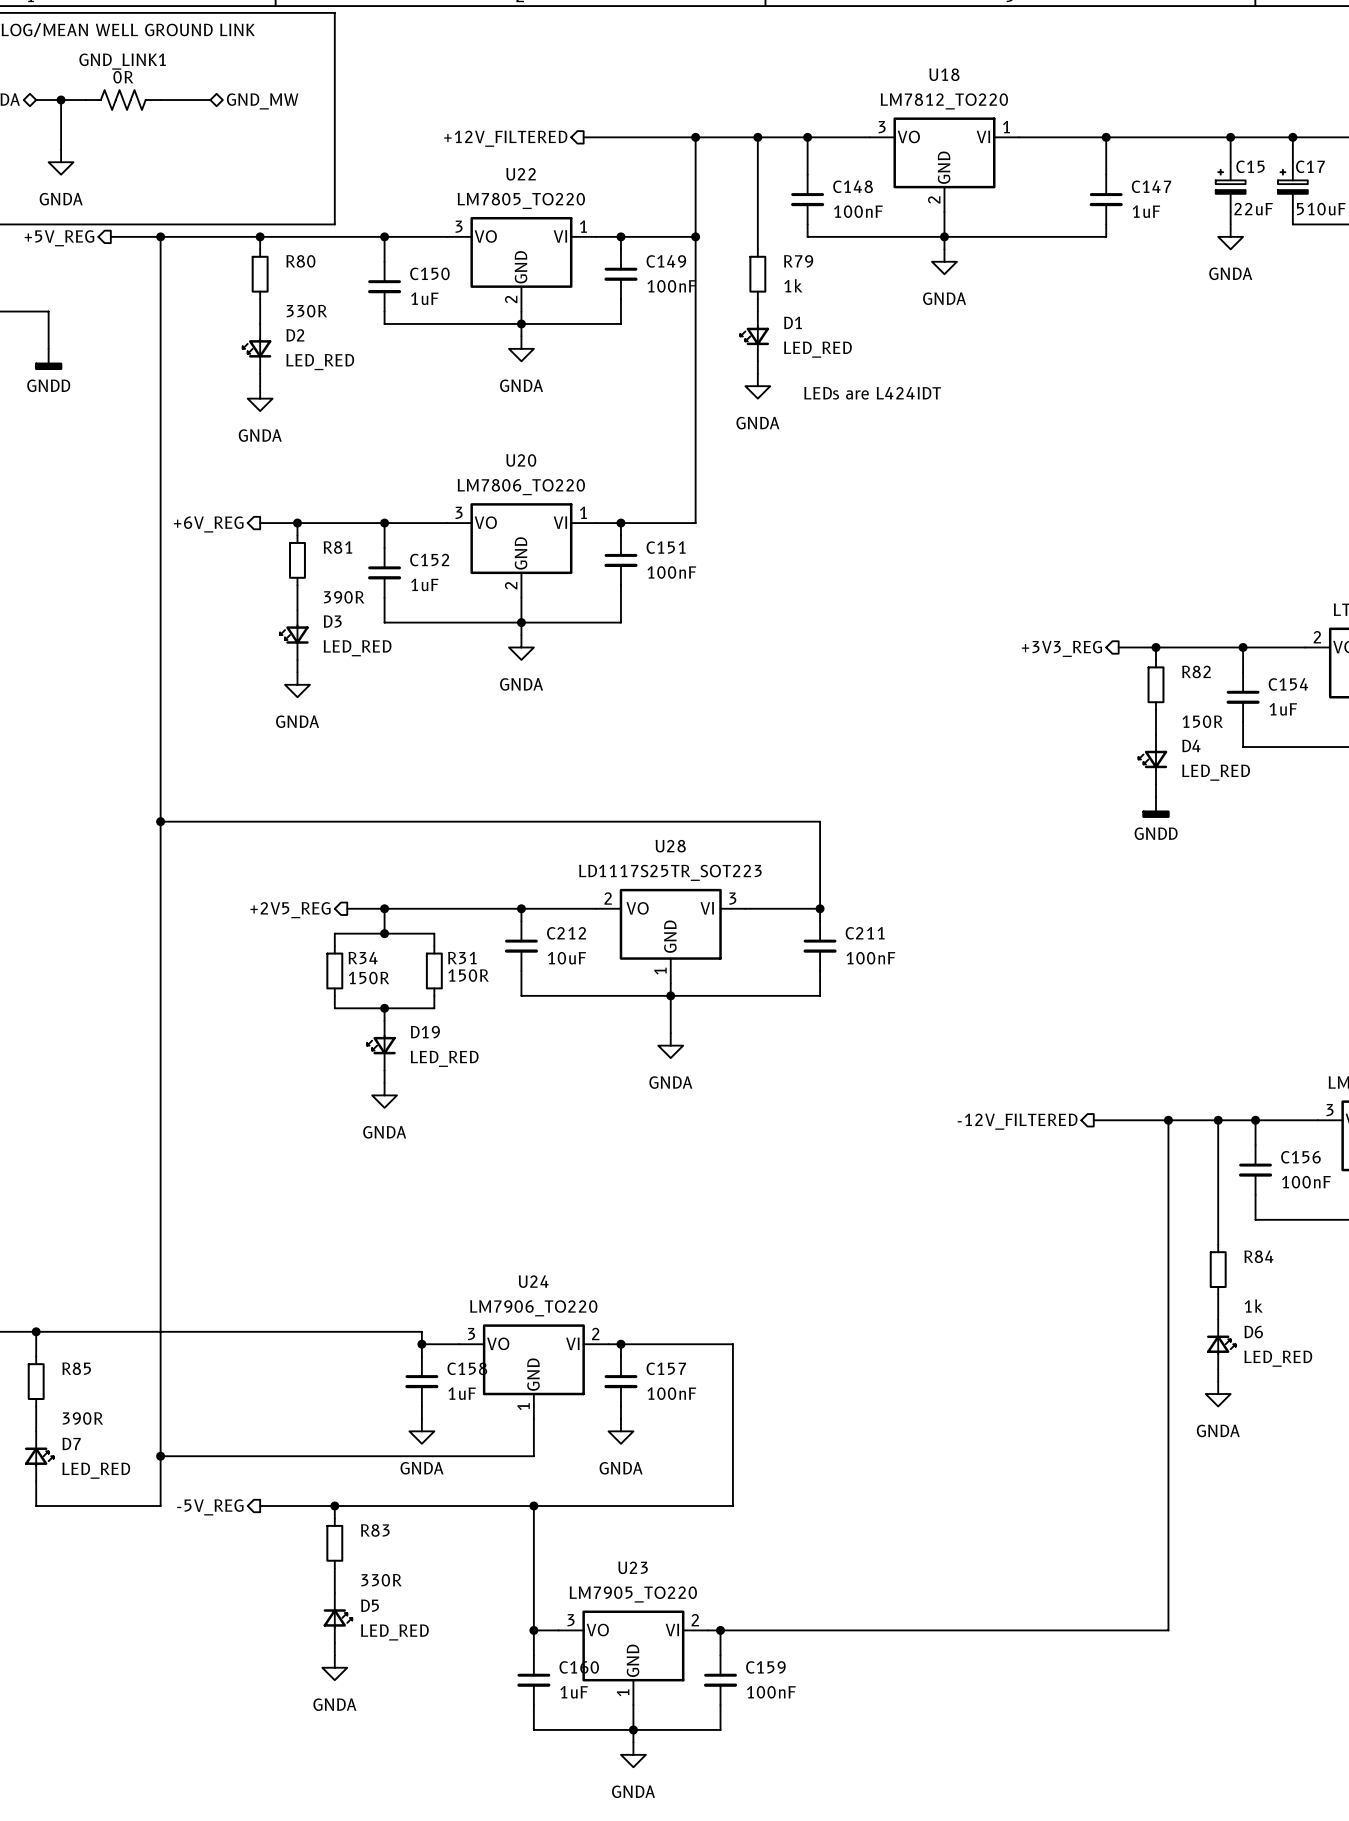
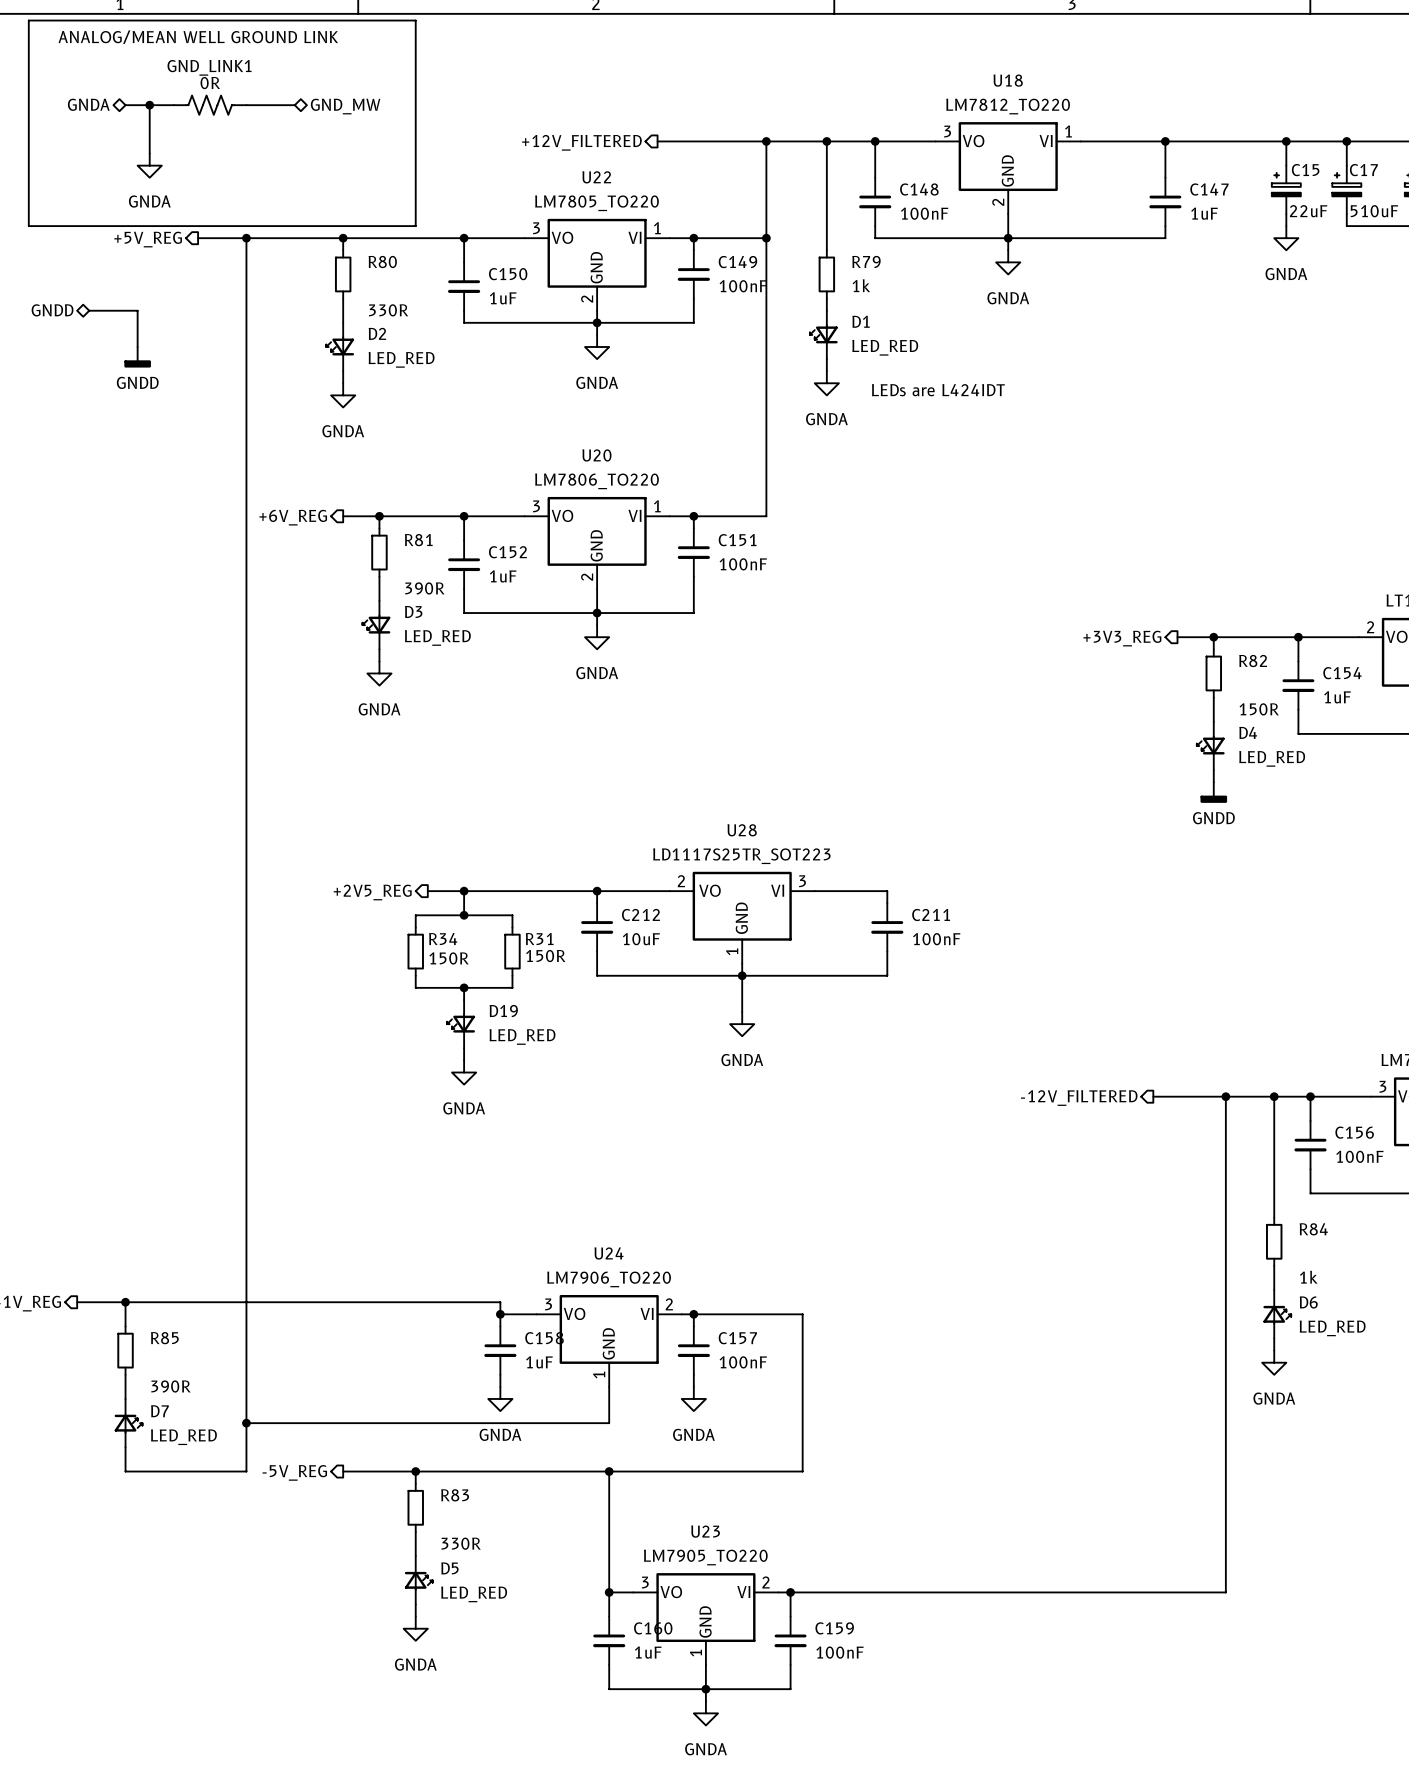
wire: (160, 821) (820, 821) (820, 908) -> none
junction: (160, 821) -> none
junction: (820, 908) -> none

